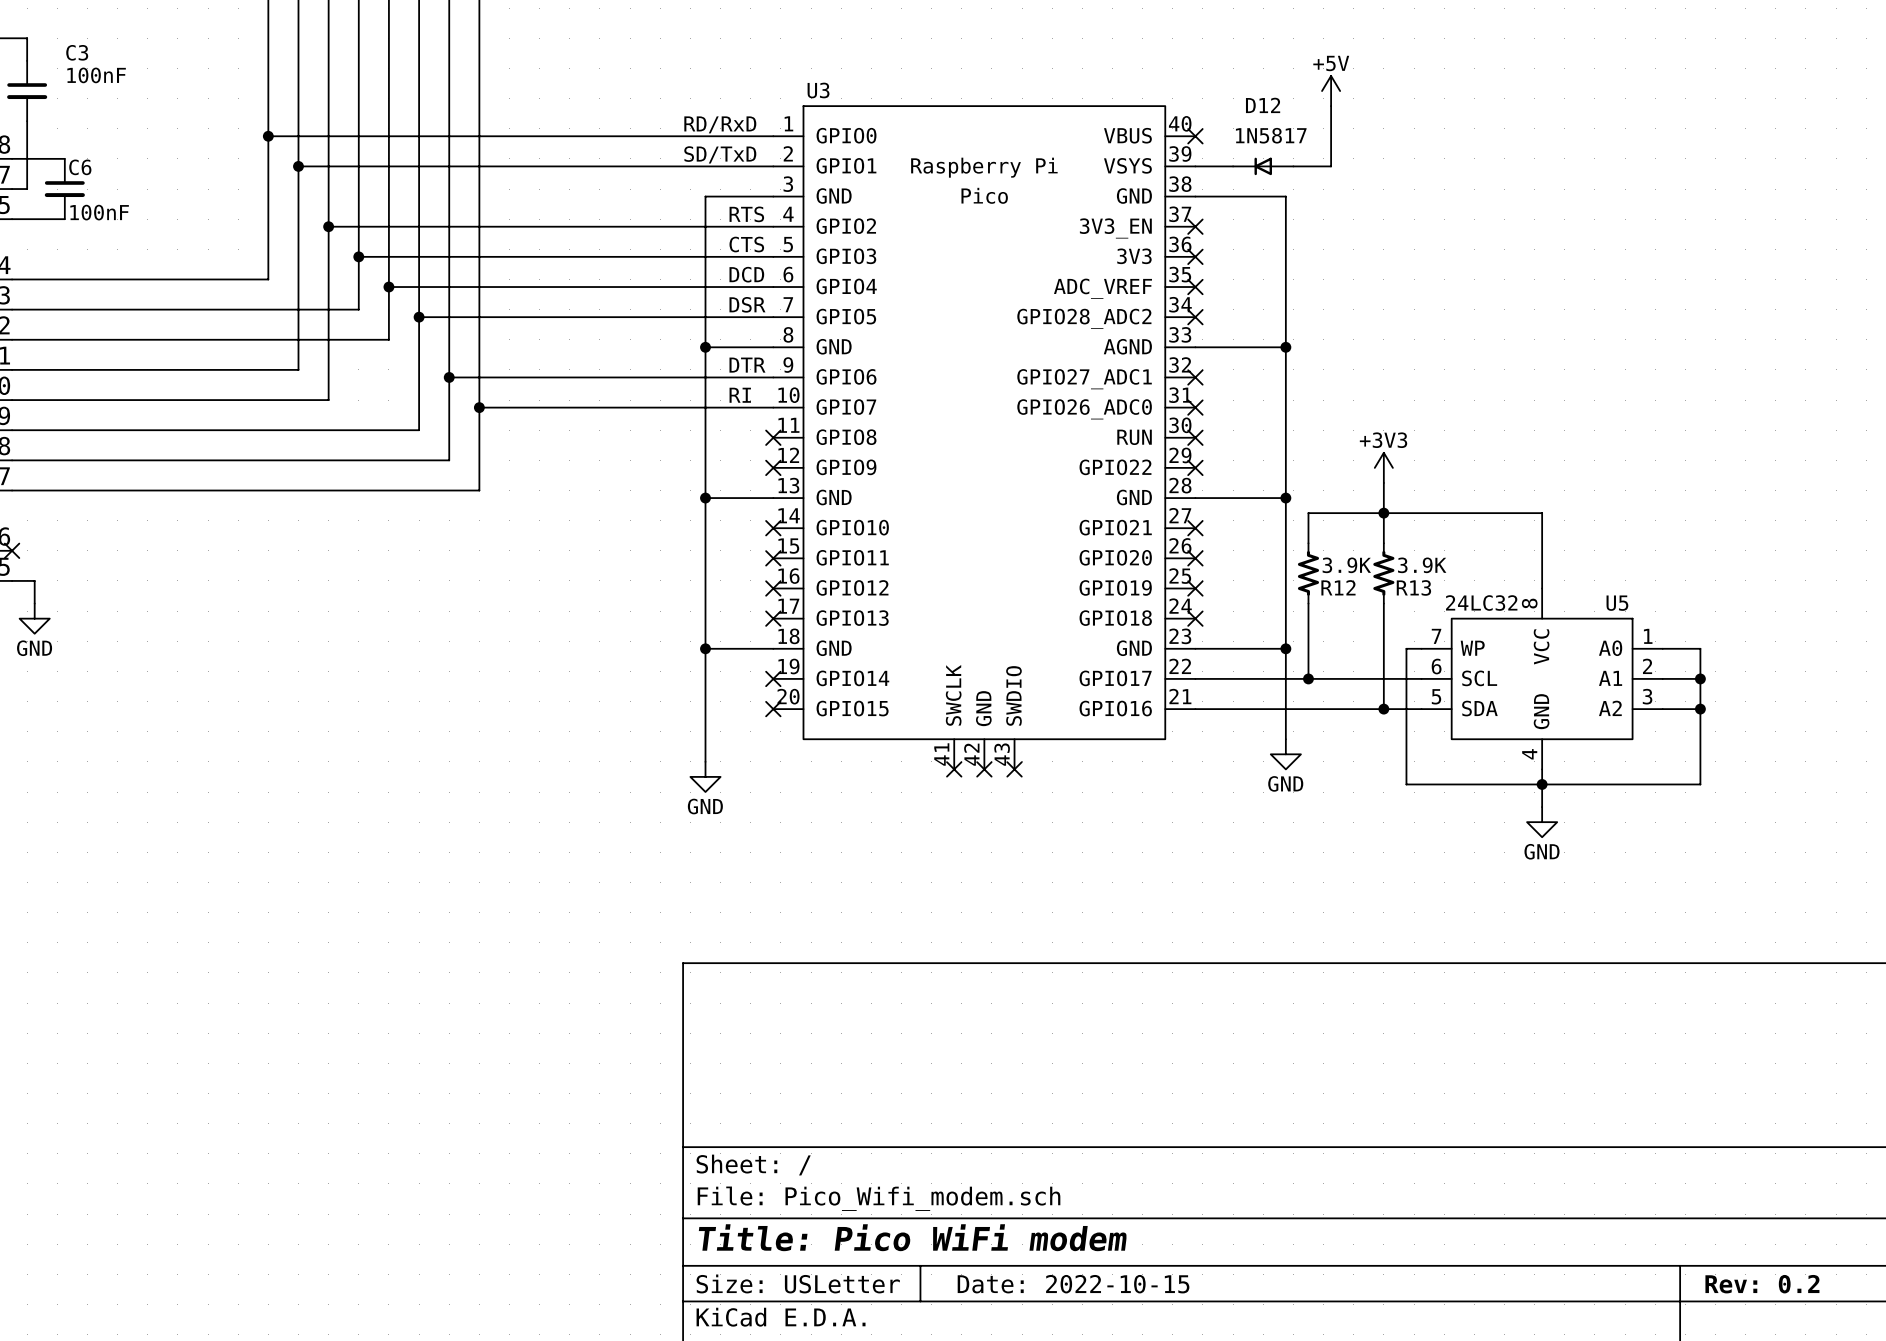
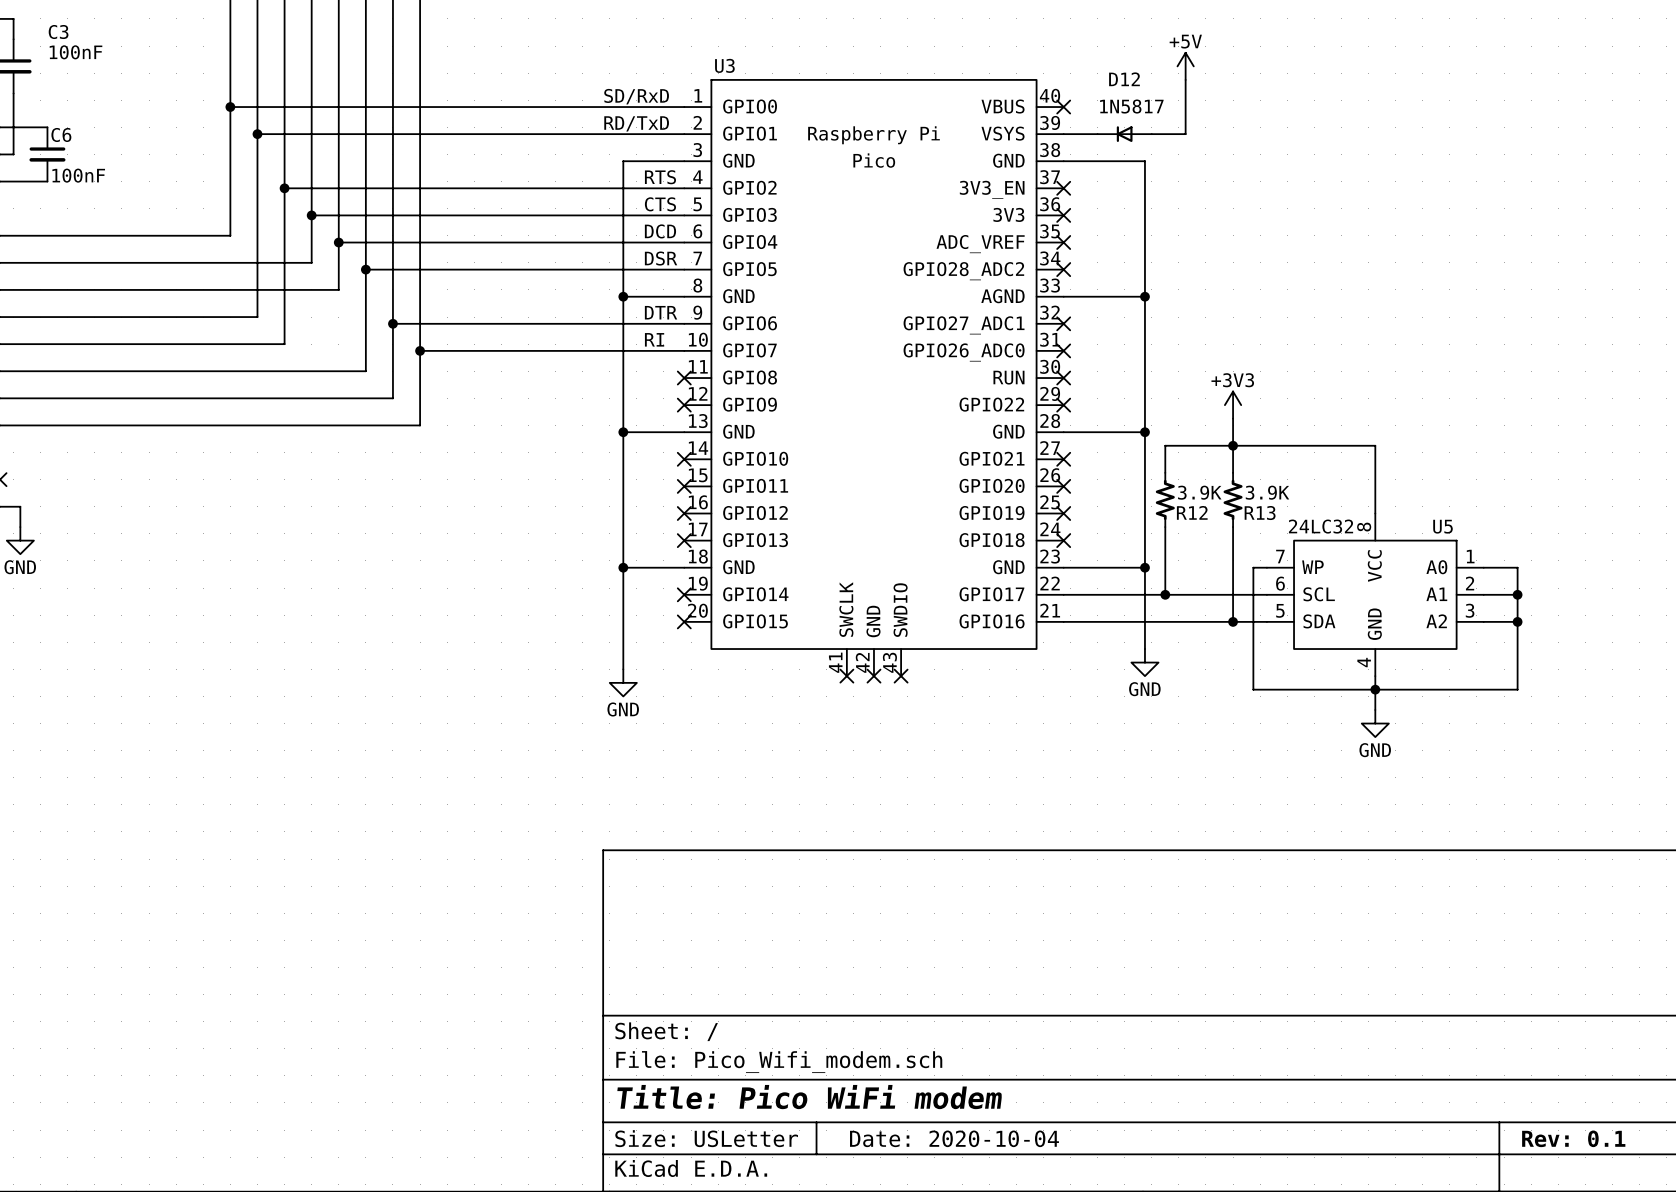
text: RD/RxD (720, 124) -> SD/RxD (636, 96)
text: SD/TxD (720, 154) -> RD/TxD (636, 123)
title block: Date: 2022-10-15 (1073, 1284) -> Date: 2020-10-04 (954, 1138)
title block: Rev: 0.2 (1762, 1284) -> Rev: 0.1 (1573, 1138)

